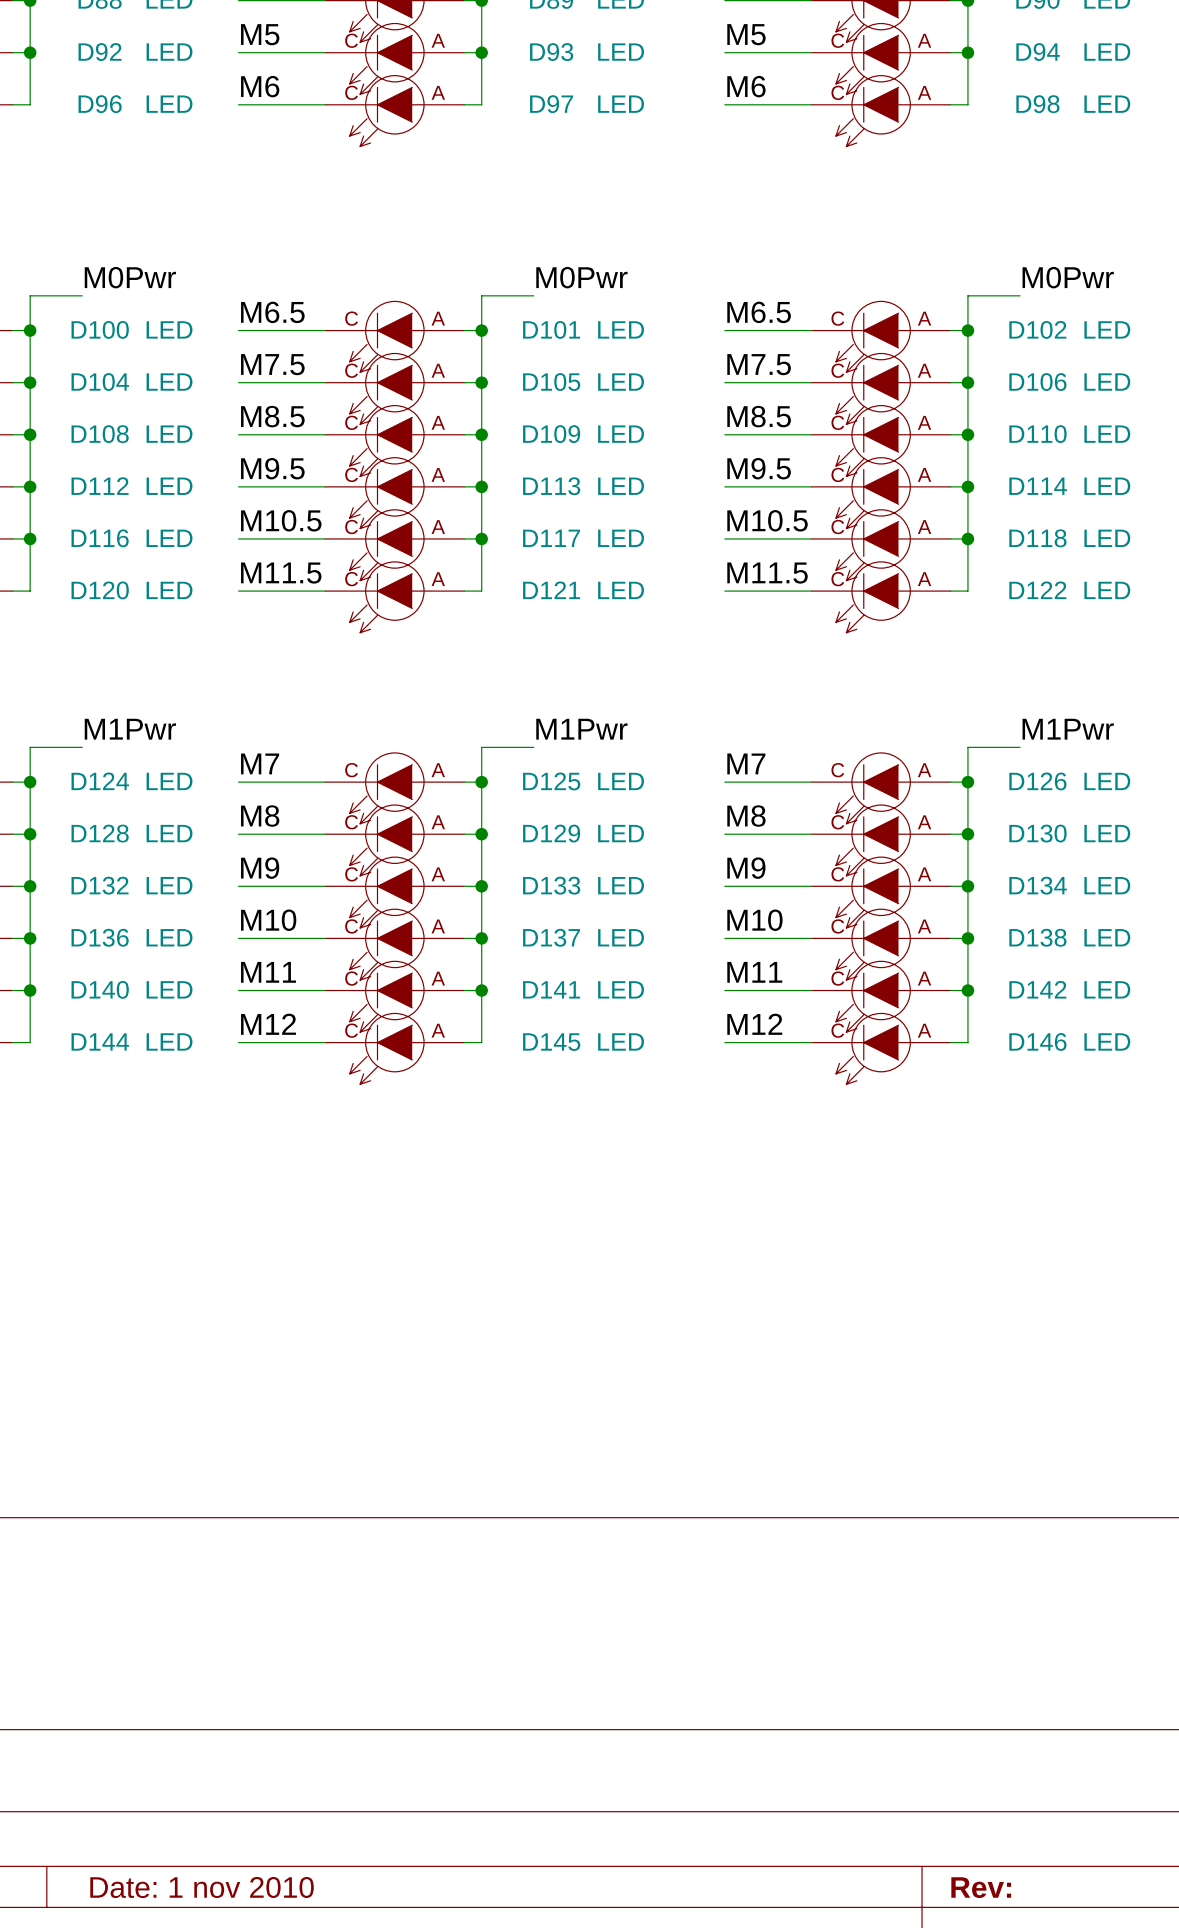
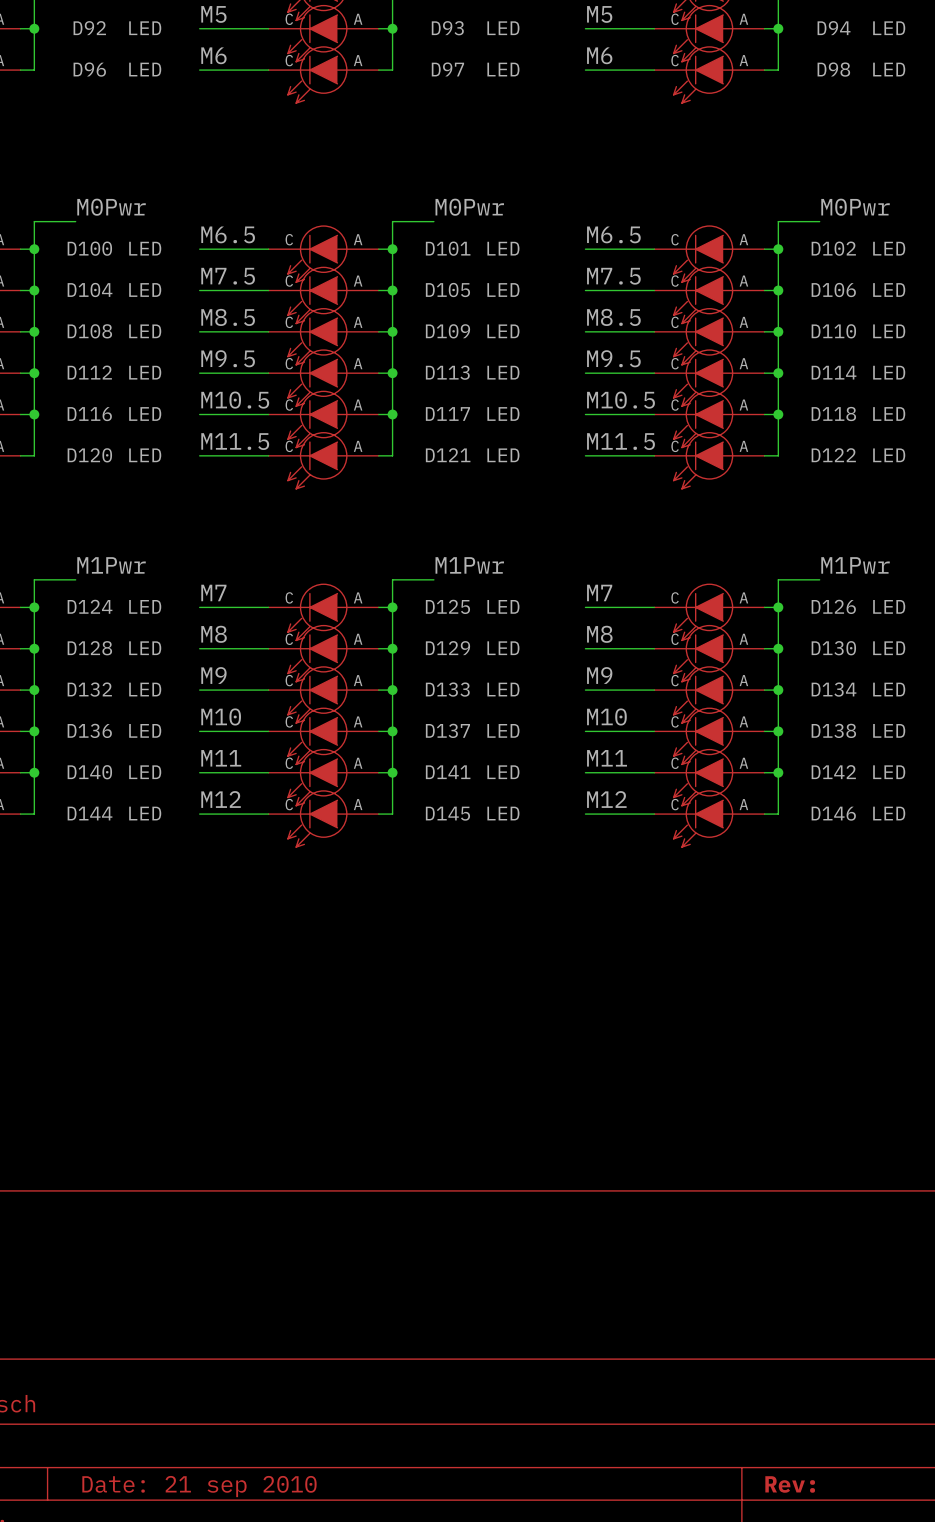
title block: Date: 1 nov 2010 (202, 1887) -> Date: 21 sep 2010 (199, 1486)

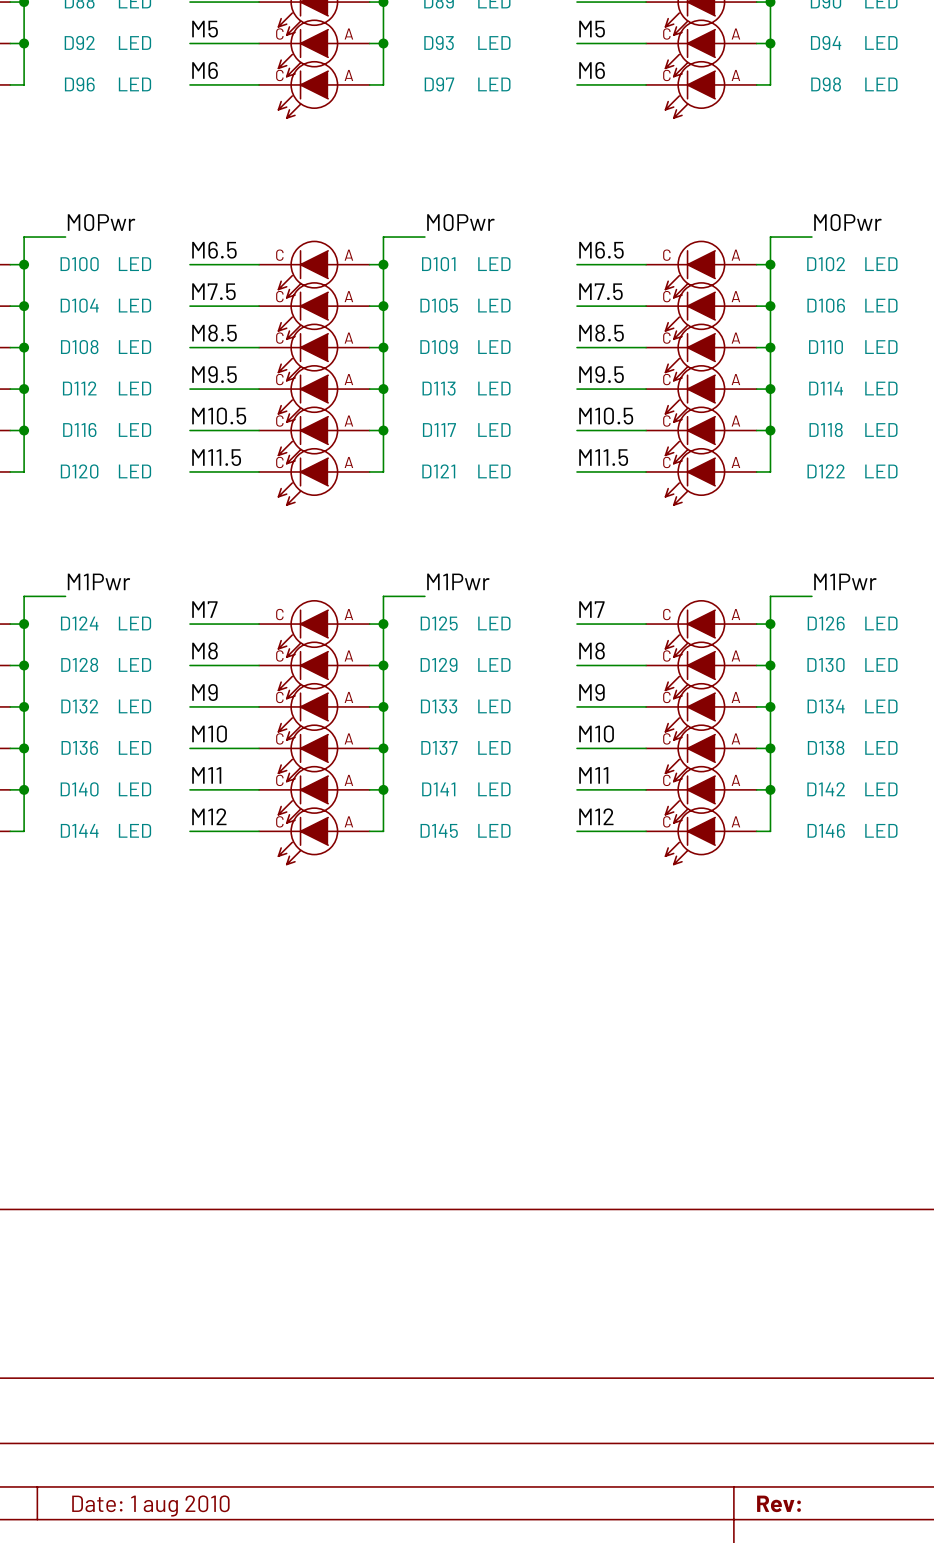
title block: Date: 21 sep 2010 (199, 1486) -> Date: 1 aug 2010 (150, 1506)

